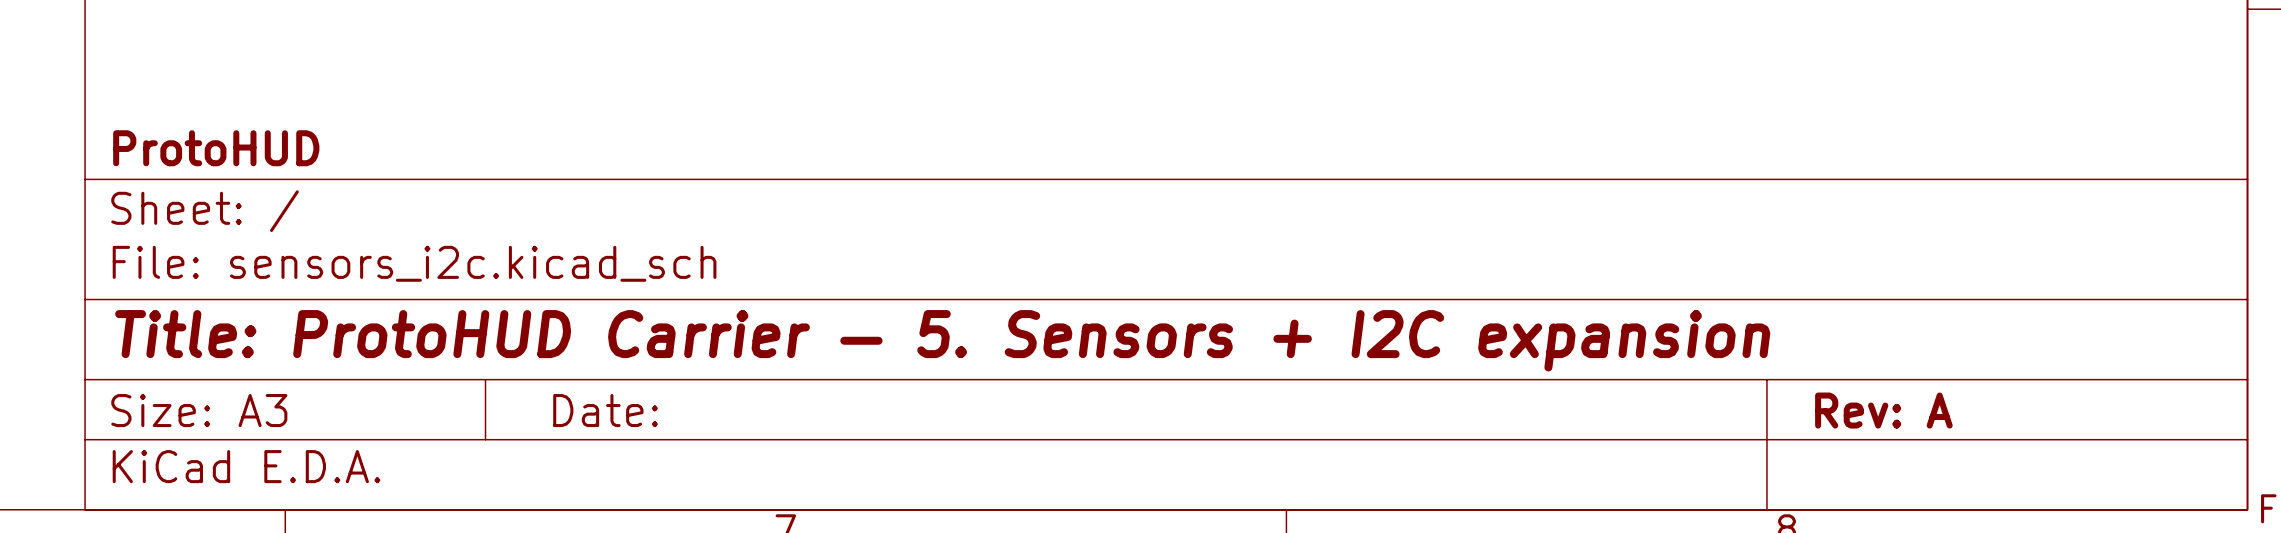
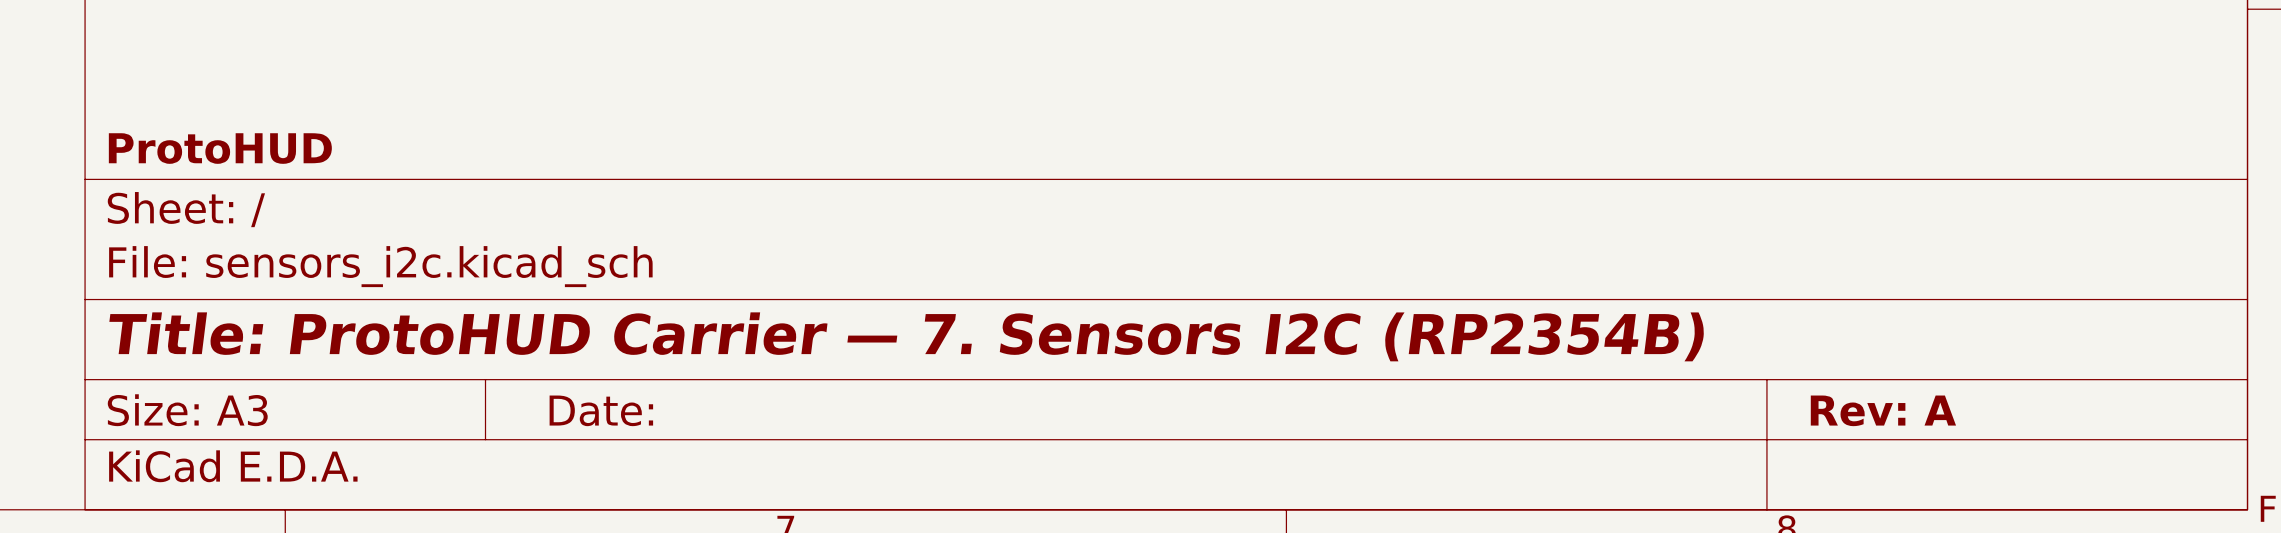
title block: Title: ProtoHUD Carrier — 5. Sensors + I2C expansion (942, 340) -> Title: ProtoHUD Carrier — 7. Sensors I2C (RP2354B) (906, 336)

